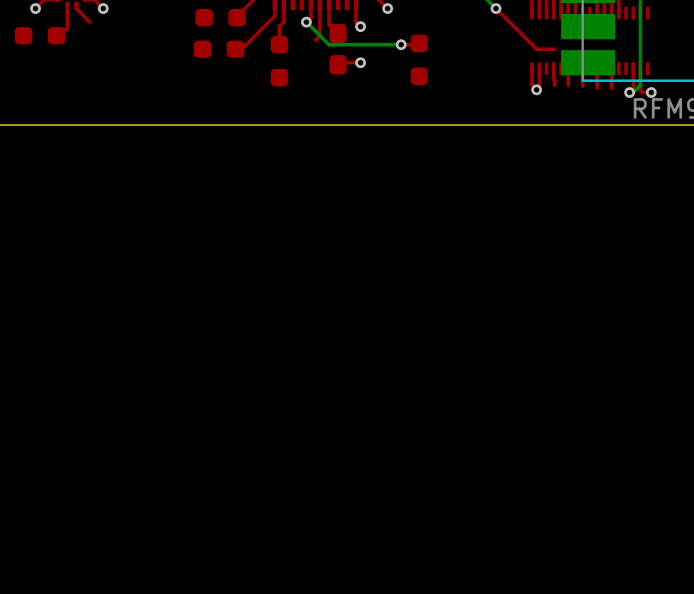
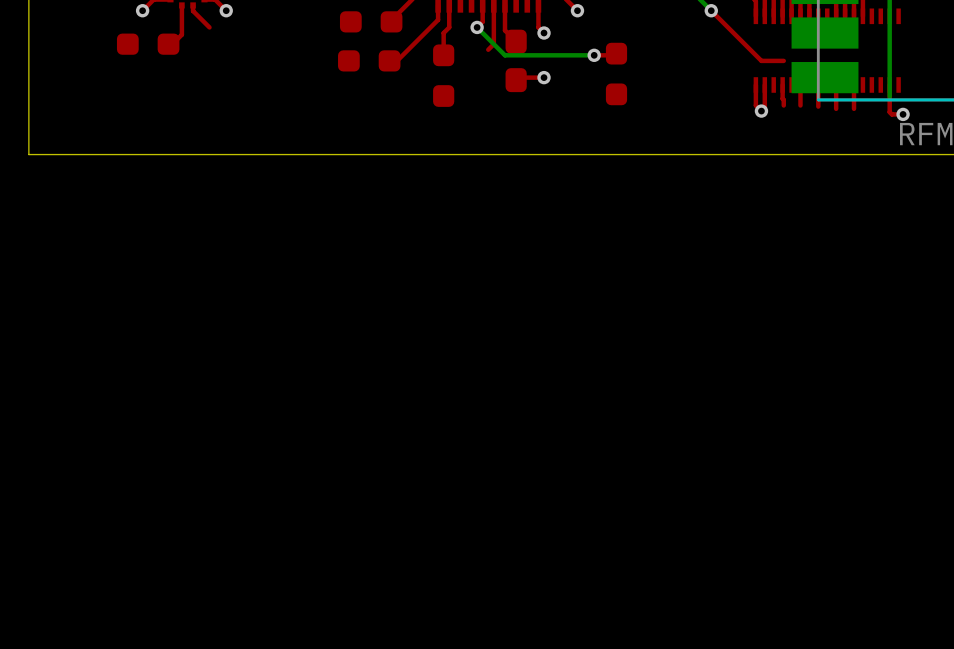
top track: (633, 68) (633, 88) (629, 92) -> none
bottom track: (640, 78) (640, 85) (633, 92) (629, 92) -> none
via: (629, 92) -> none

